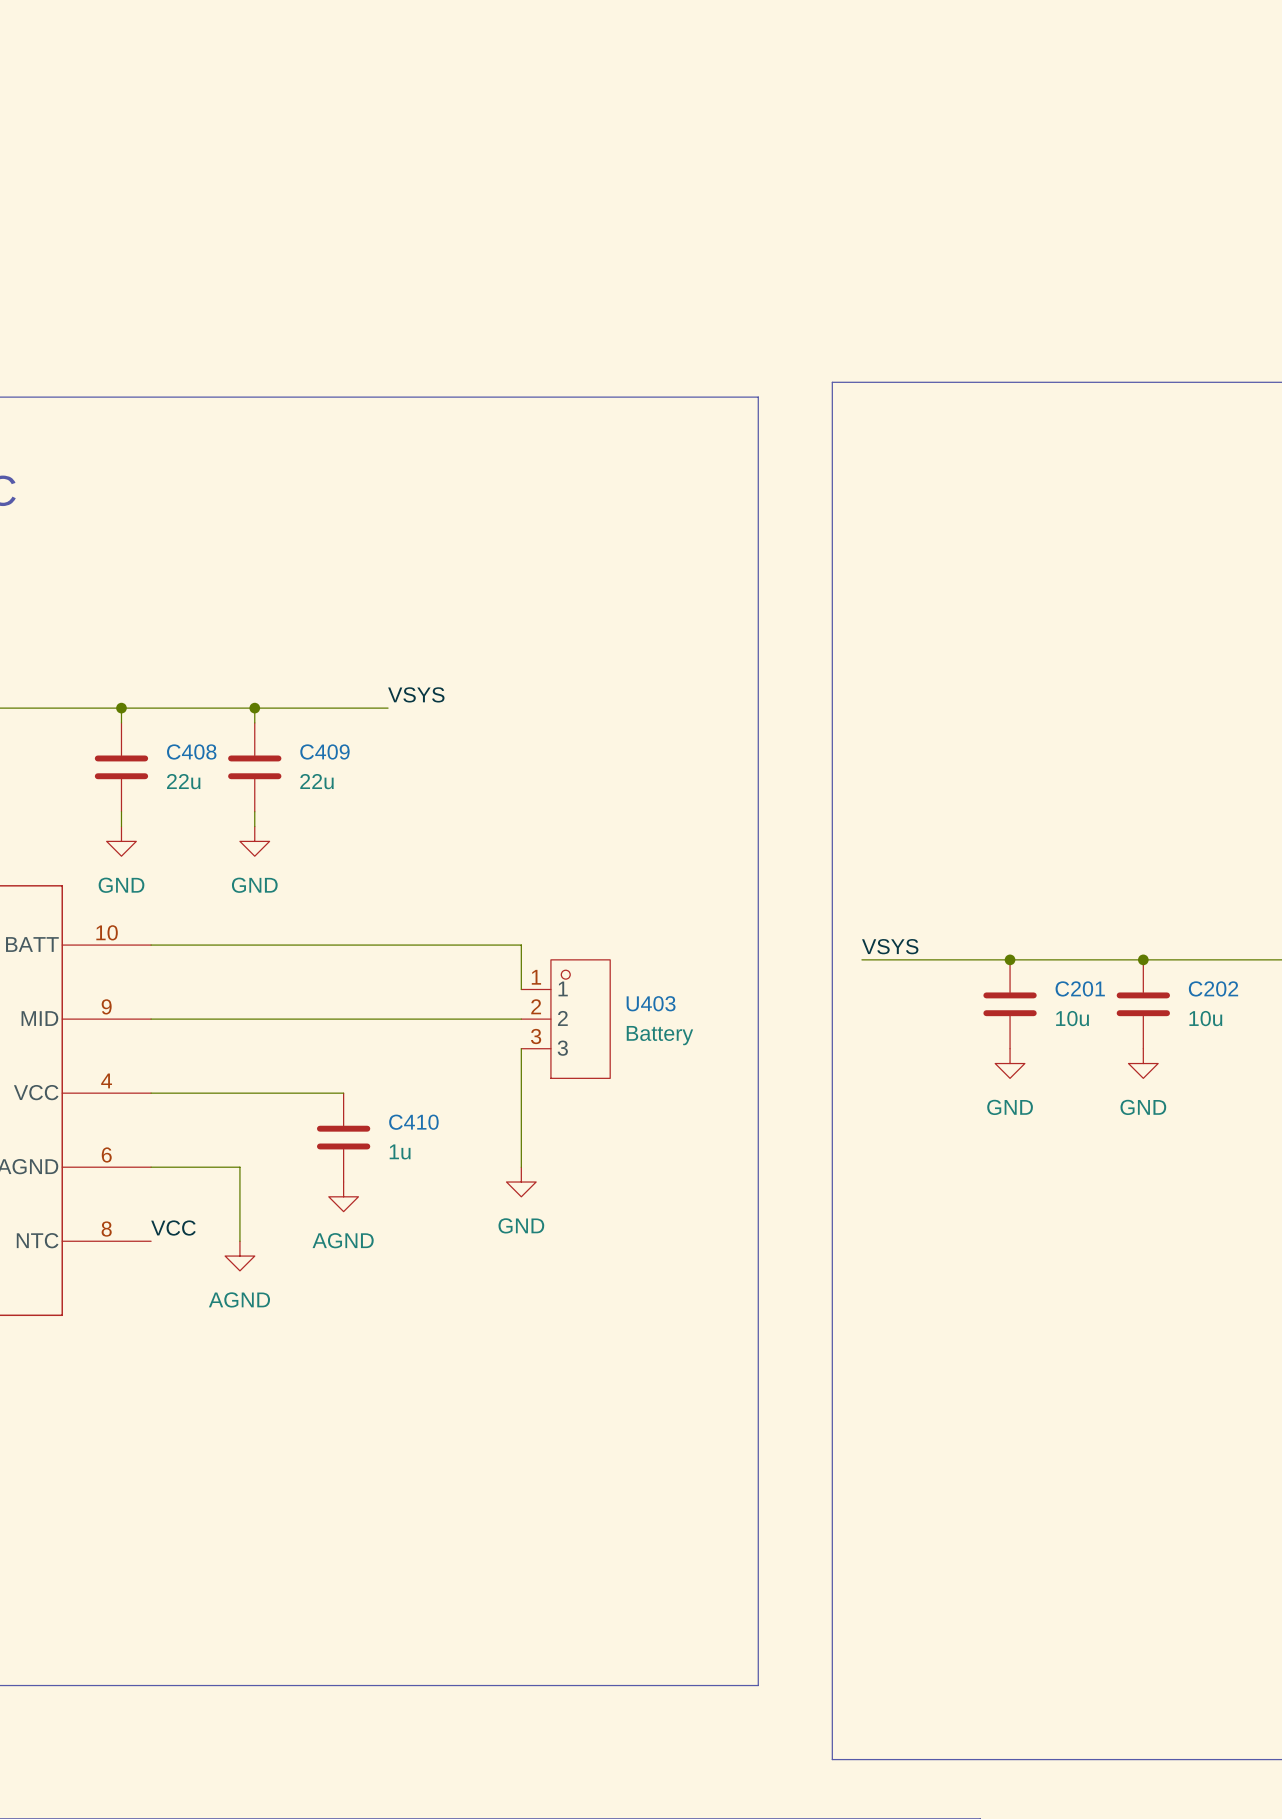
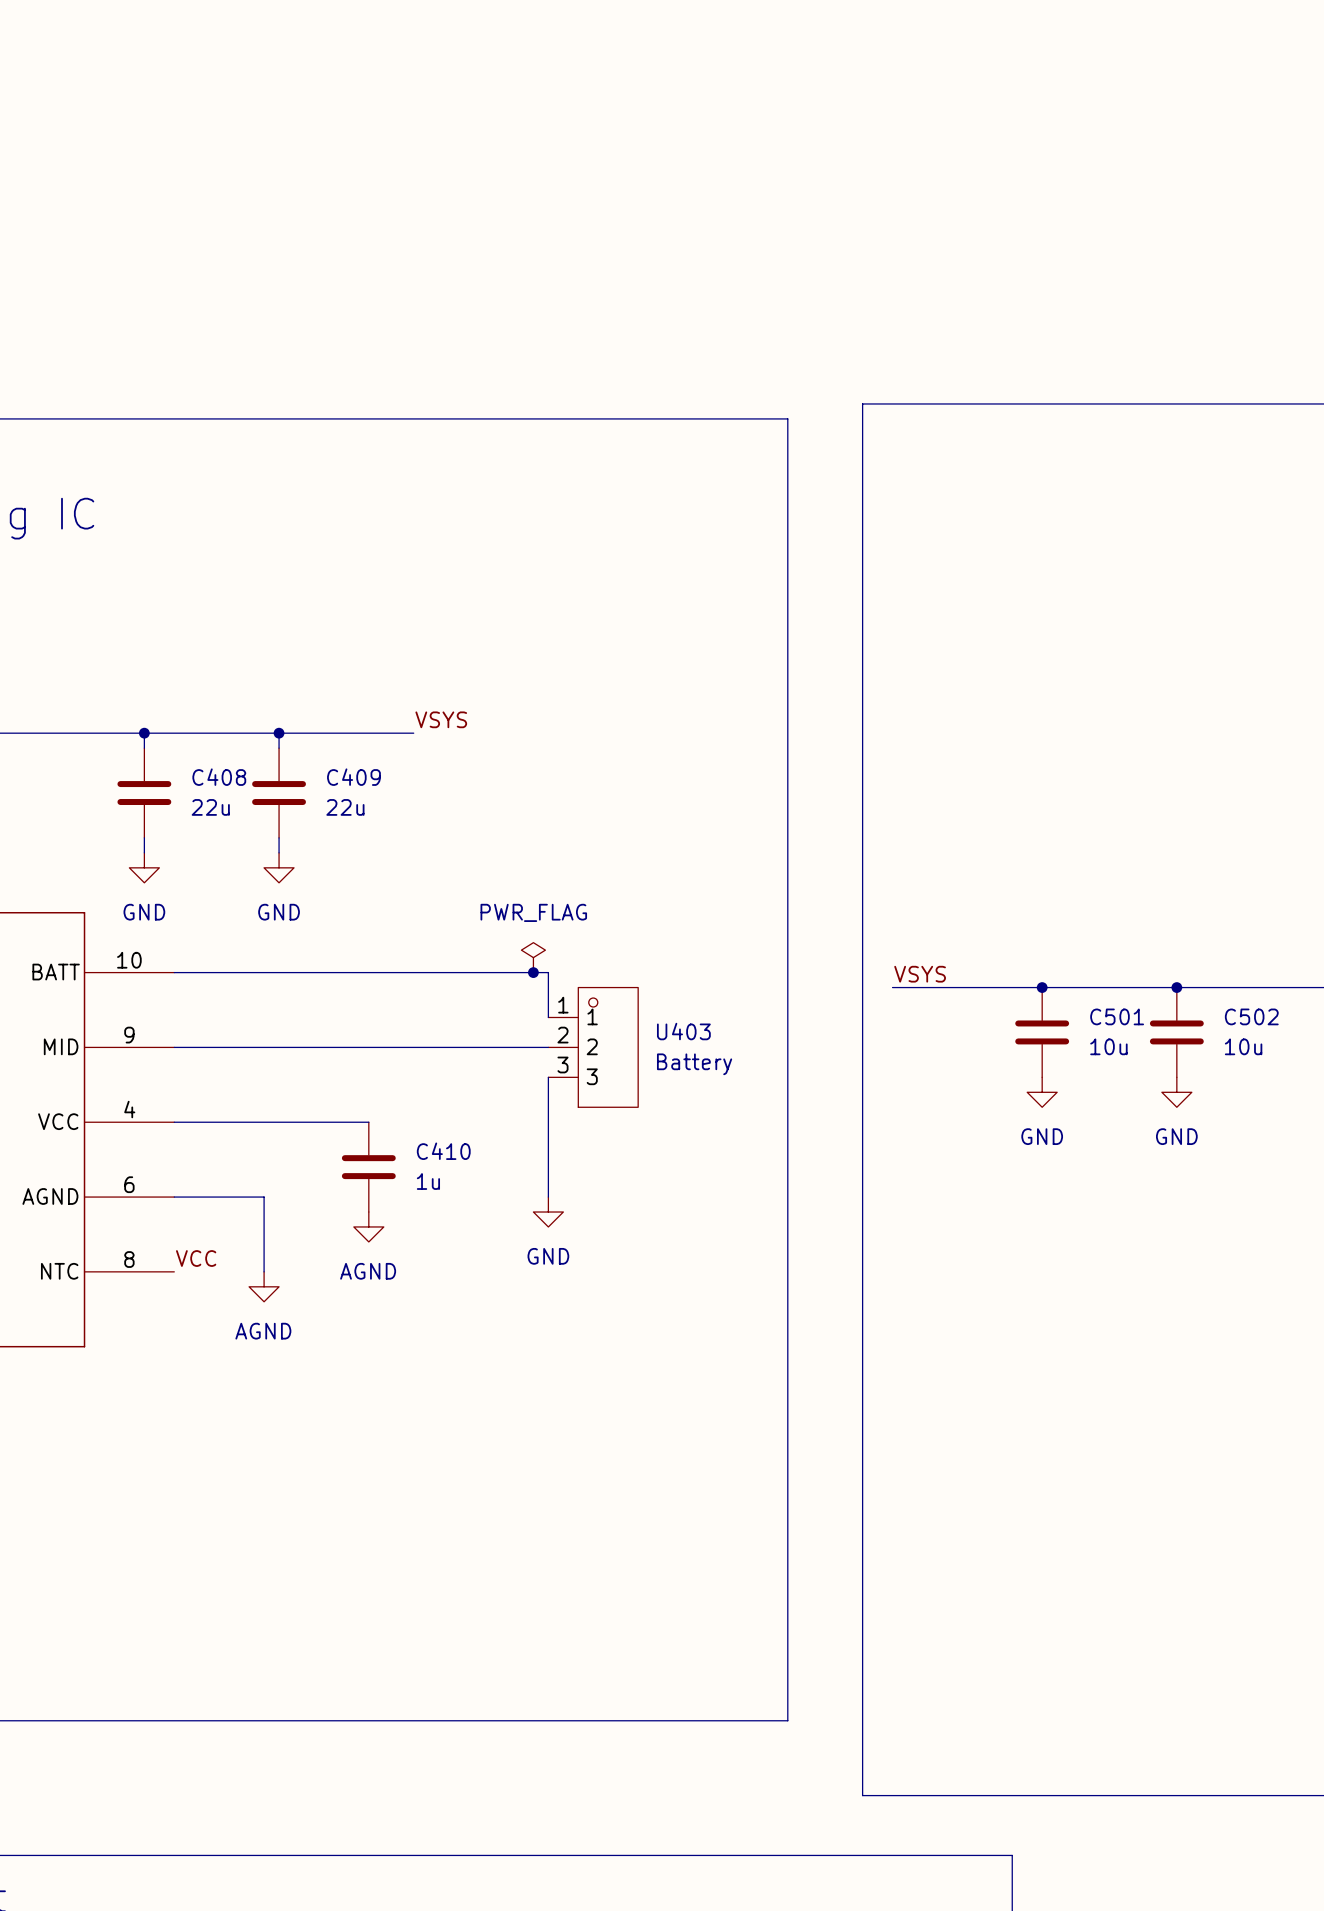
power symbol: none -> PWR_FLAG (533, 957)
junction: none -> (533, 972)
C201 name: C201 (1080, 988) -> C501 (1117, 1016)
C202 name: C202 (1213, 988) -> C502 (1251, 1016)

